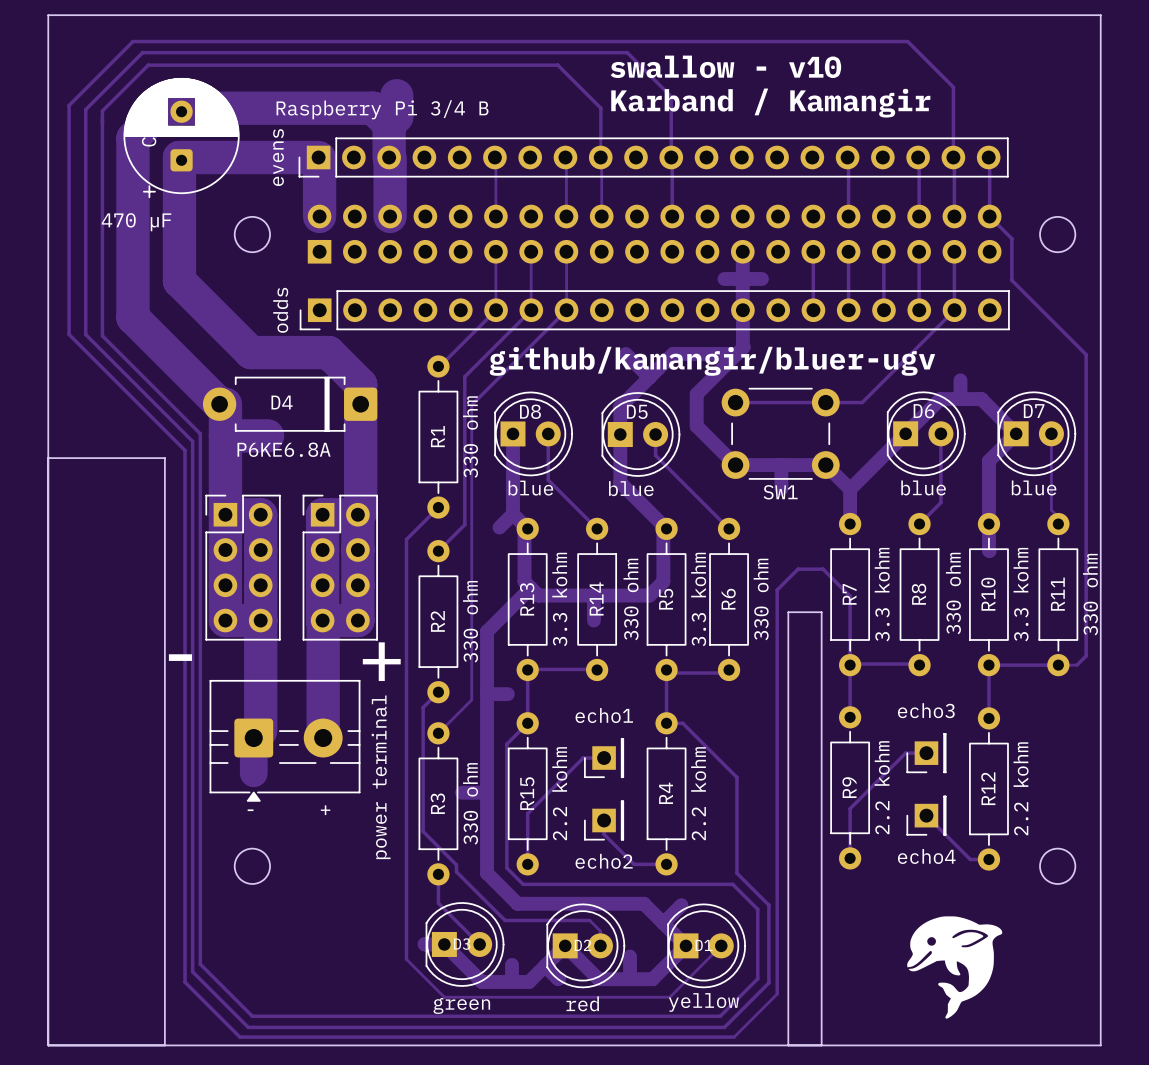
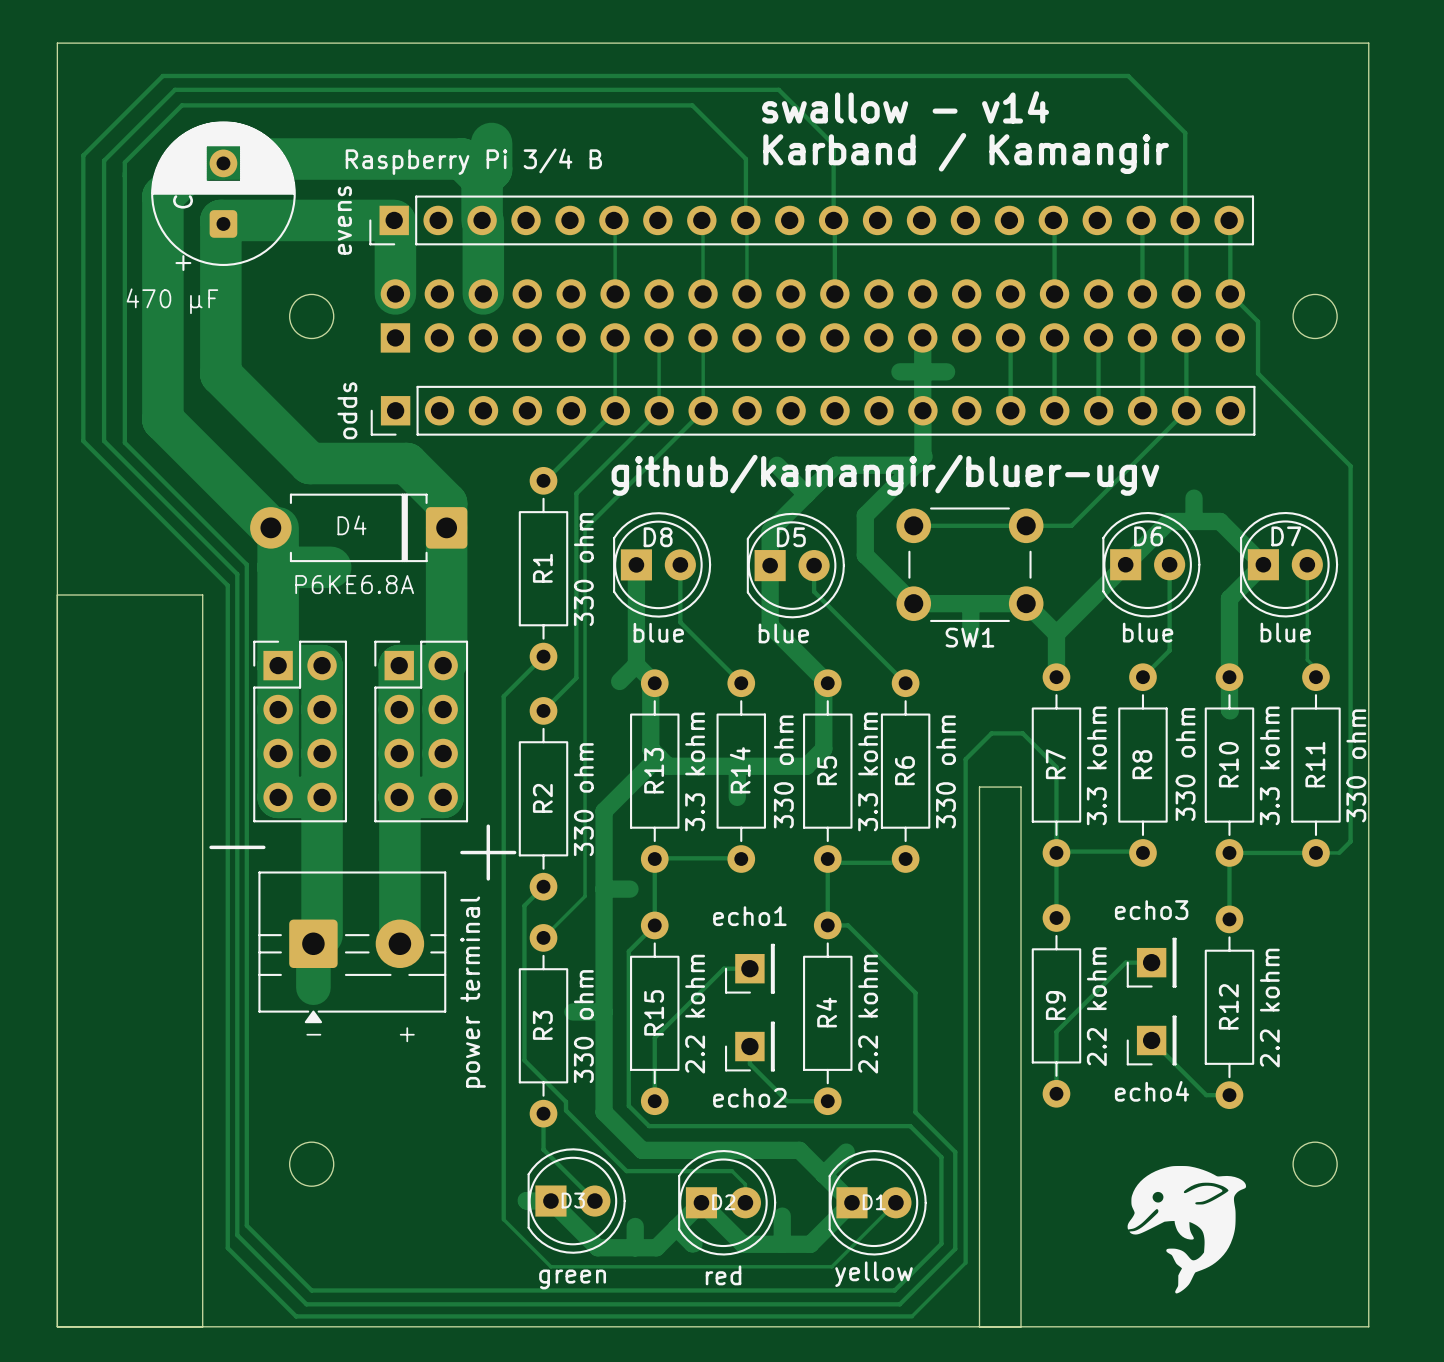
text: swallow - v10 (725, 66) -> swallow - v14 (905, 107)
round board edge position: (252, 866) -> (311, 1164)
round board edge position: (1057, 866) -> (1315, 1164)

